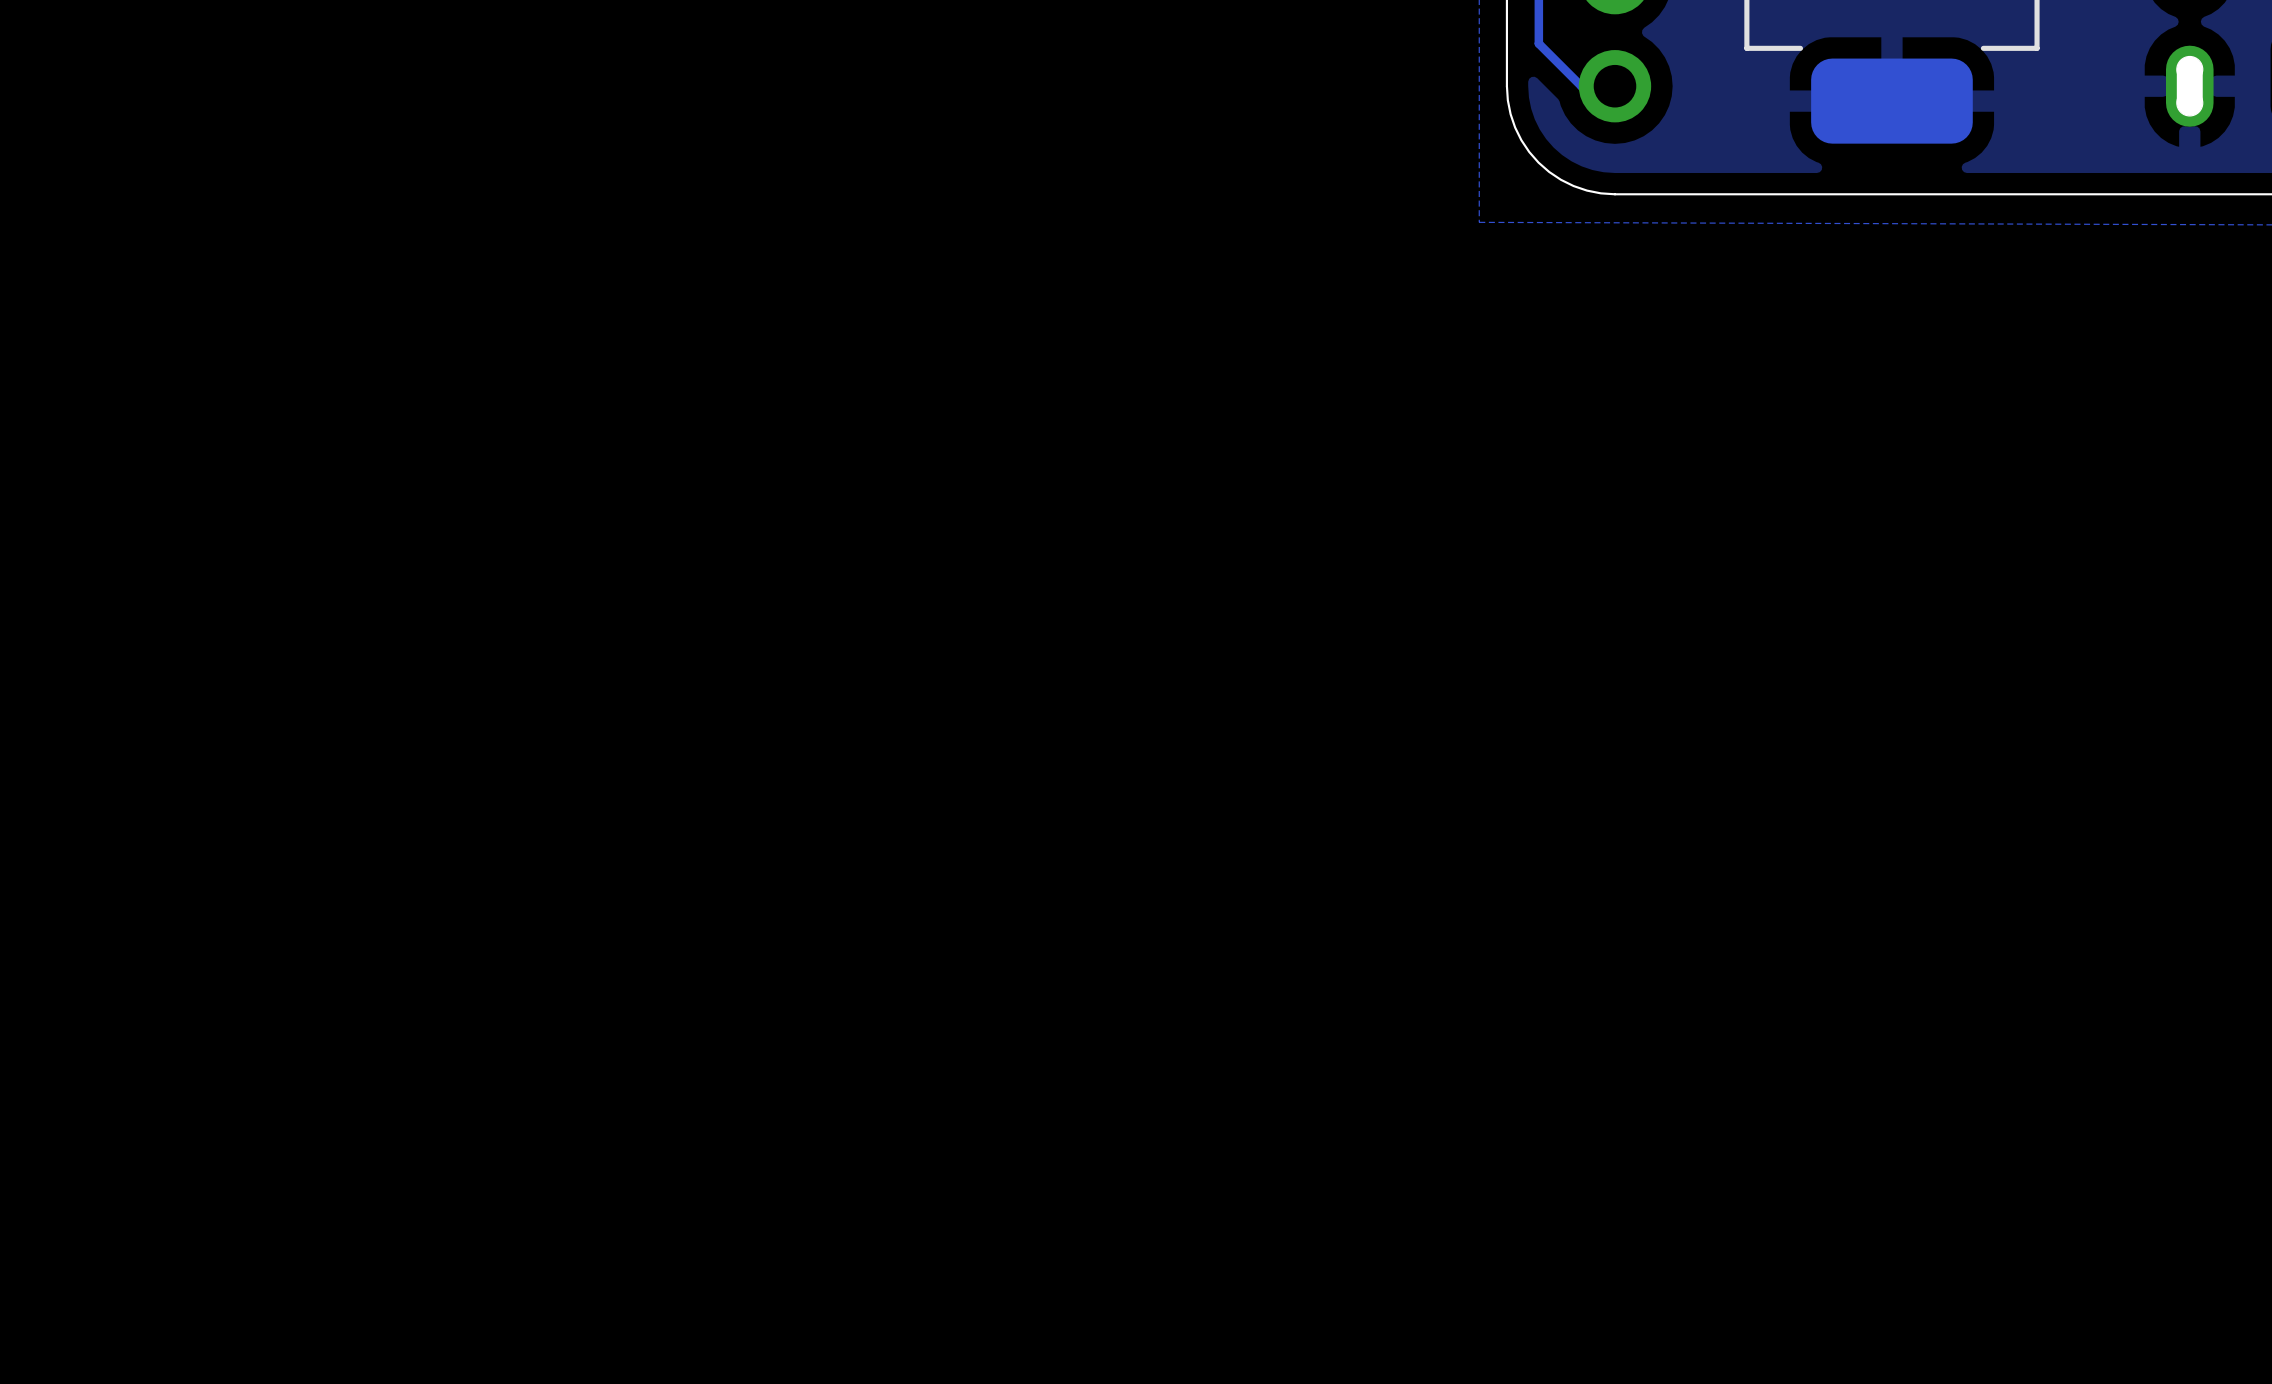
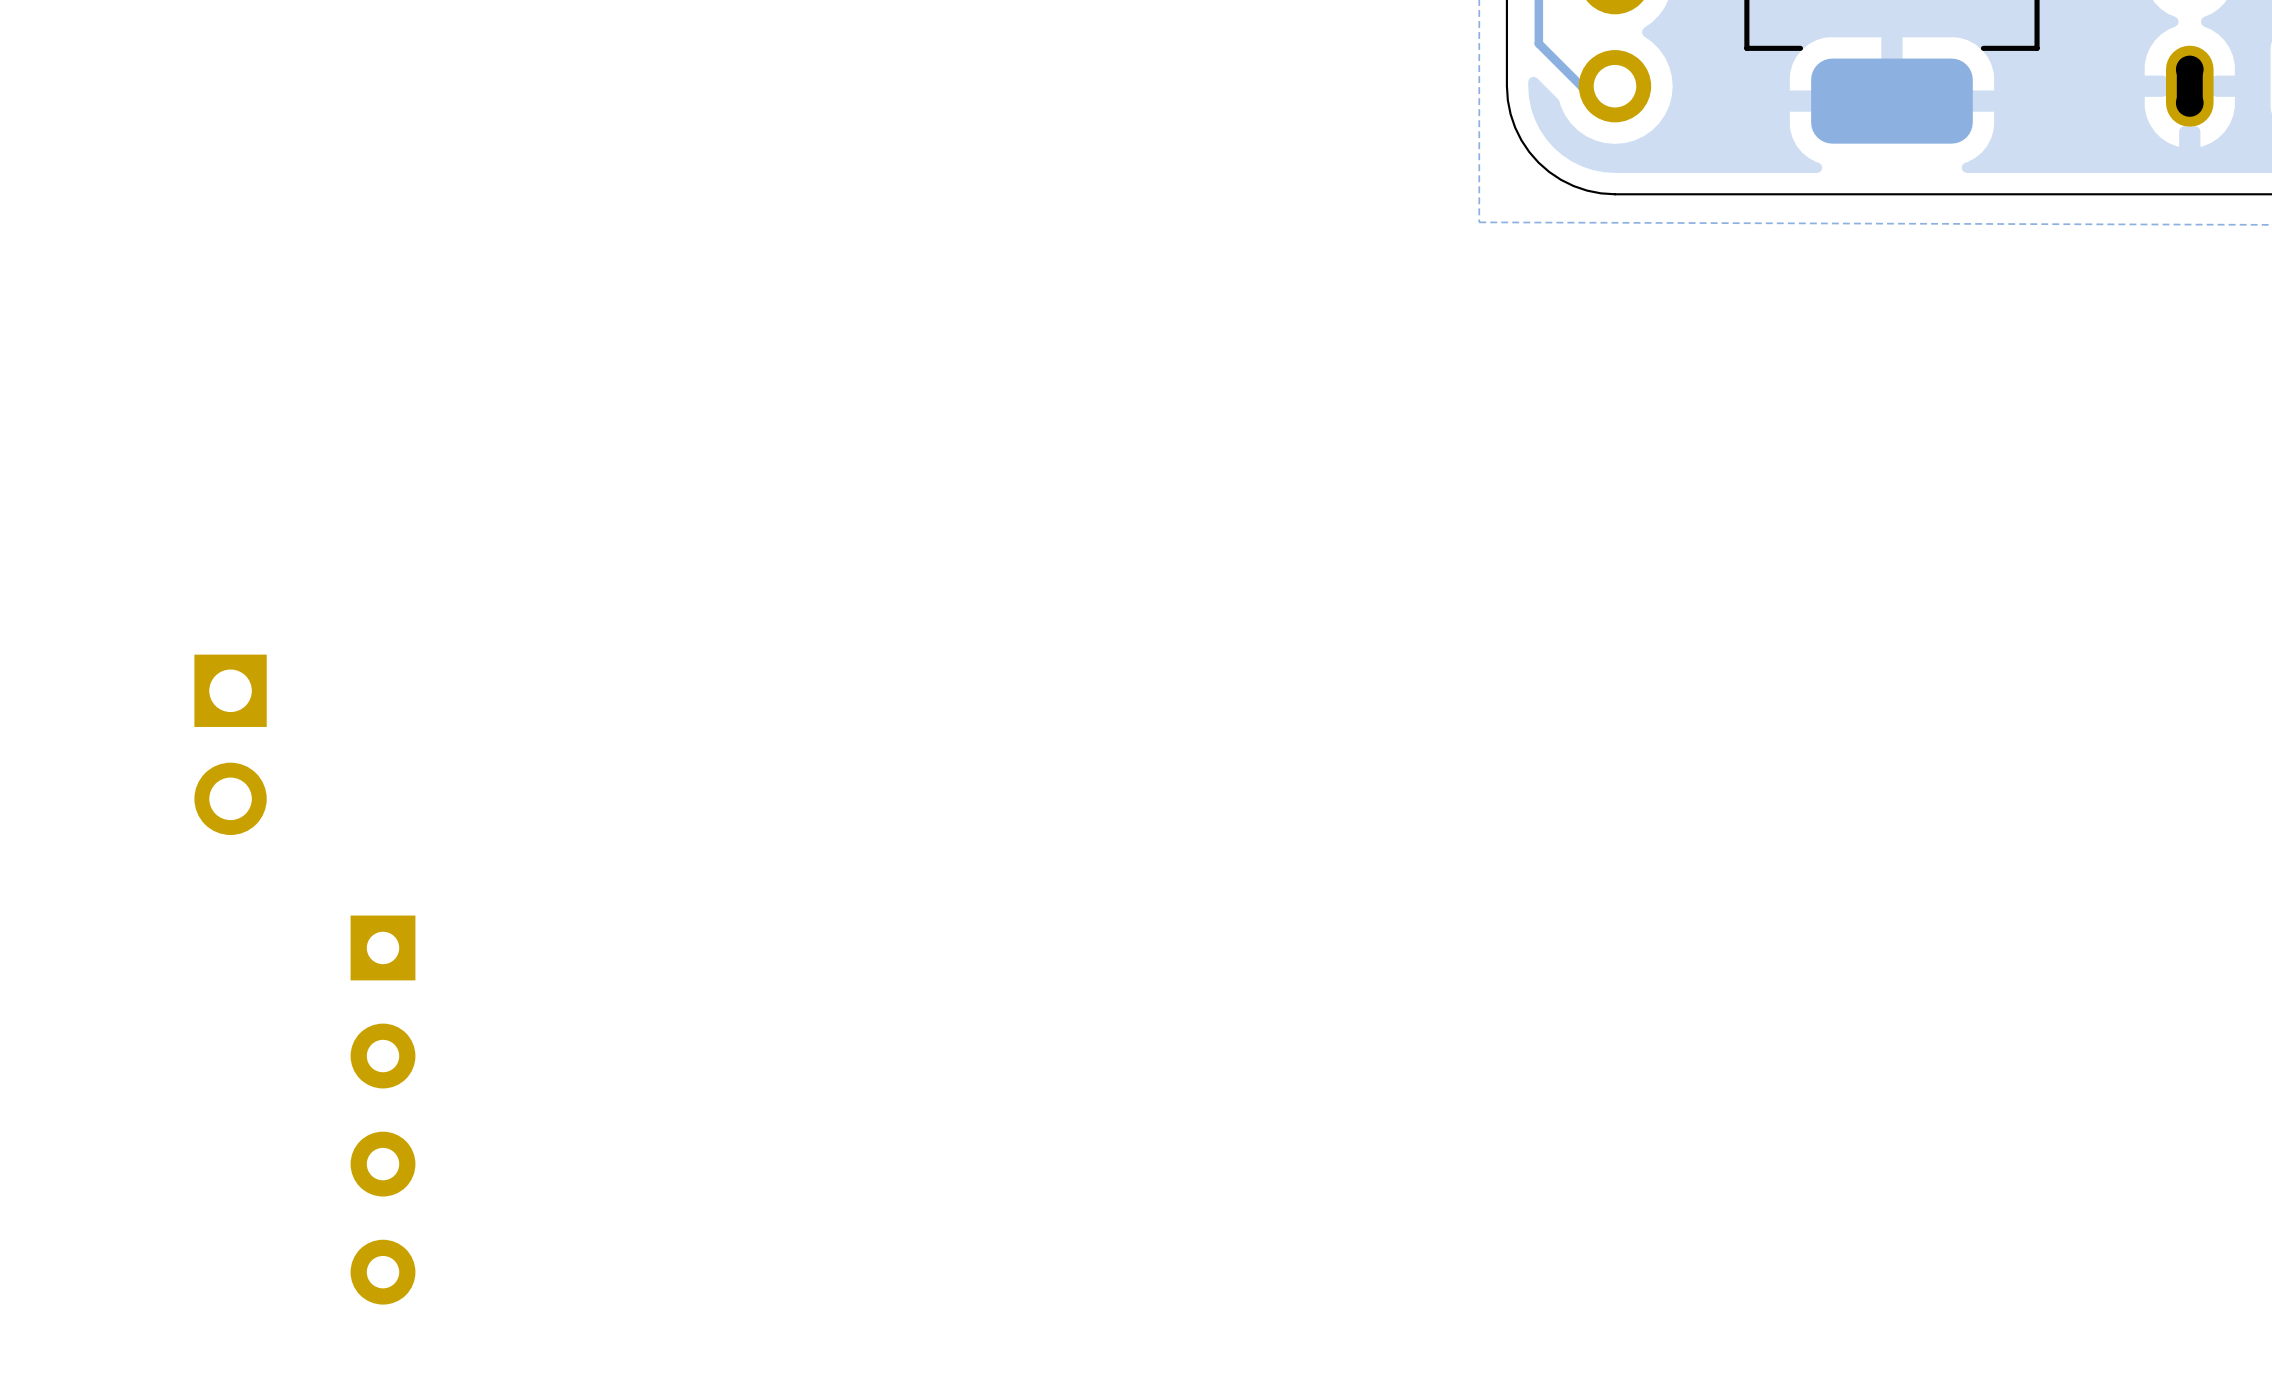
part: none -> (230, 744)
part: none -> (383, 1110)

